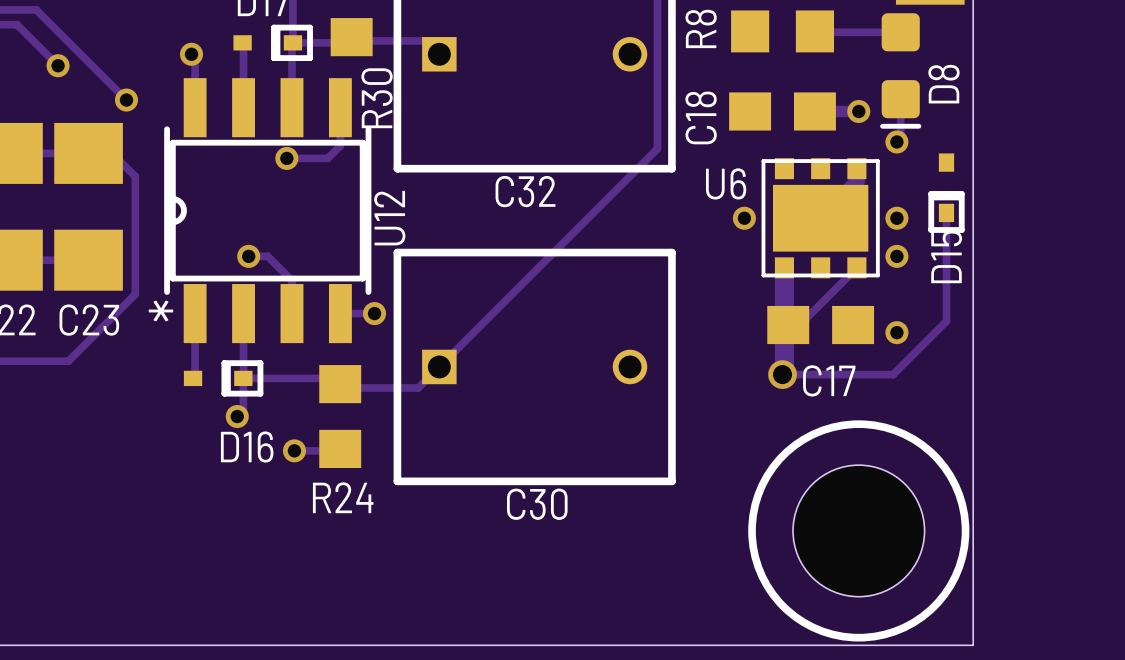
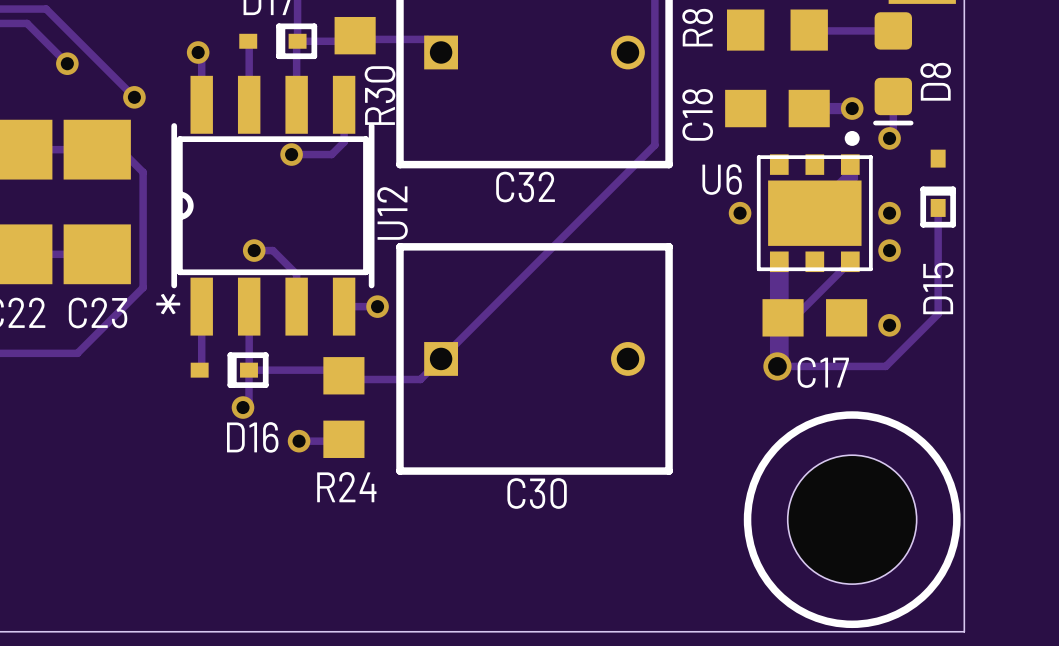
U6 footprint: [761, 158, 880, 279] -> [756, 130, 873, 273]
D15 name position: D15 (946, 256) -> D15 (938, 288)

